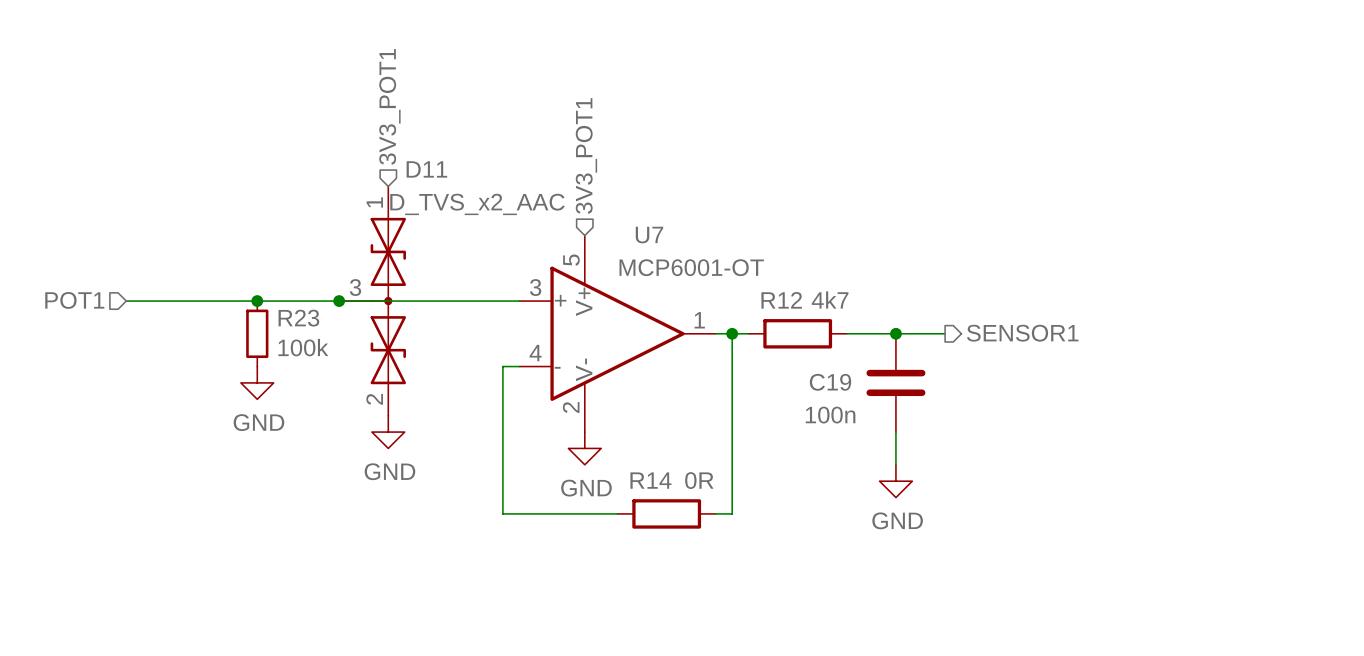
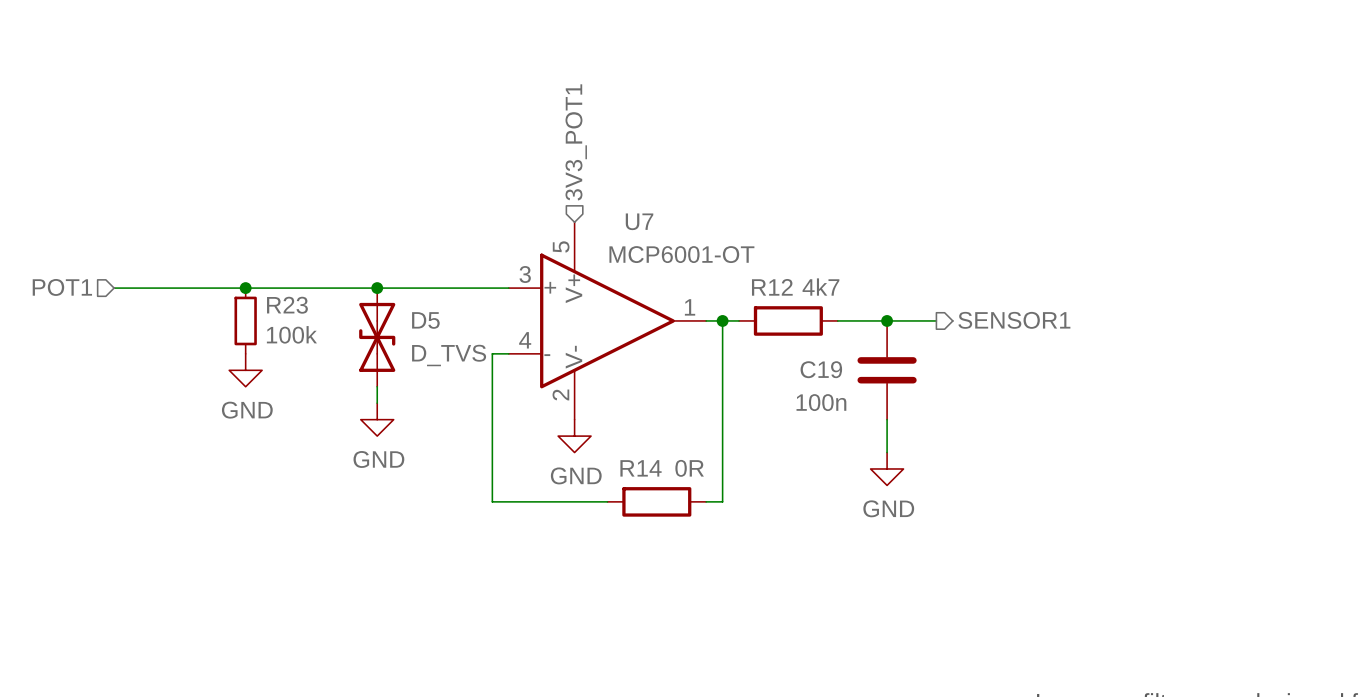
hierarchical label: 3V3_POT1 (389, 106) -> none
junction position: (339, 301) -> (377, 288)
D11: D_TVS_x2_AAC (372, 301) -> none
D5: none -> D_TVS (377, 337)

